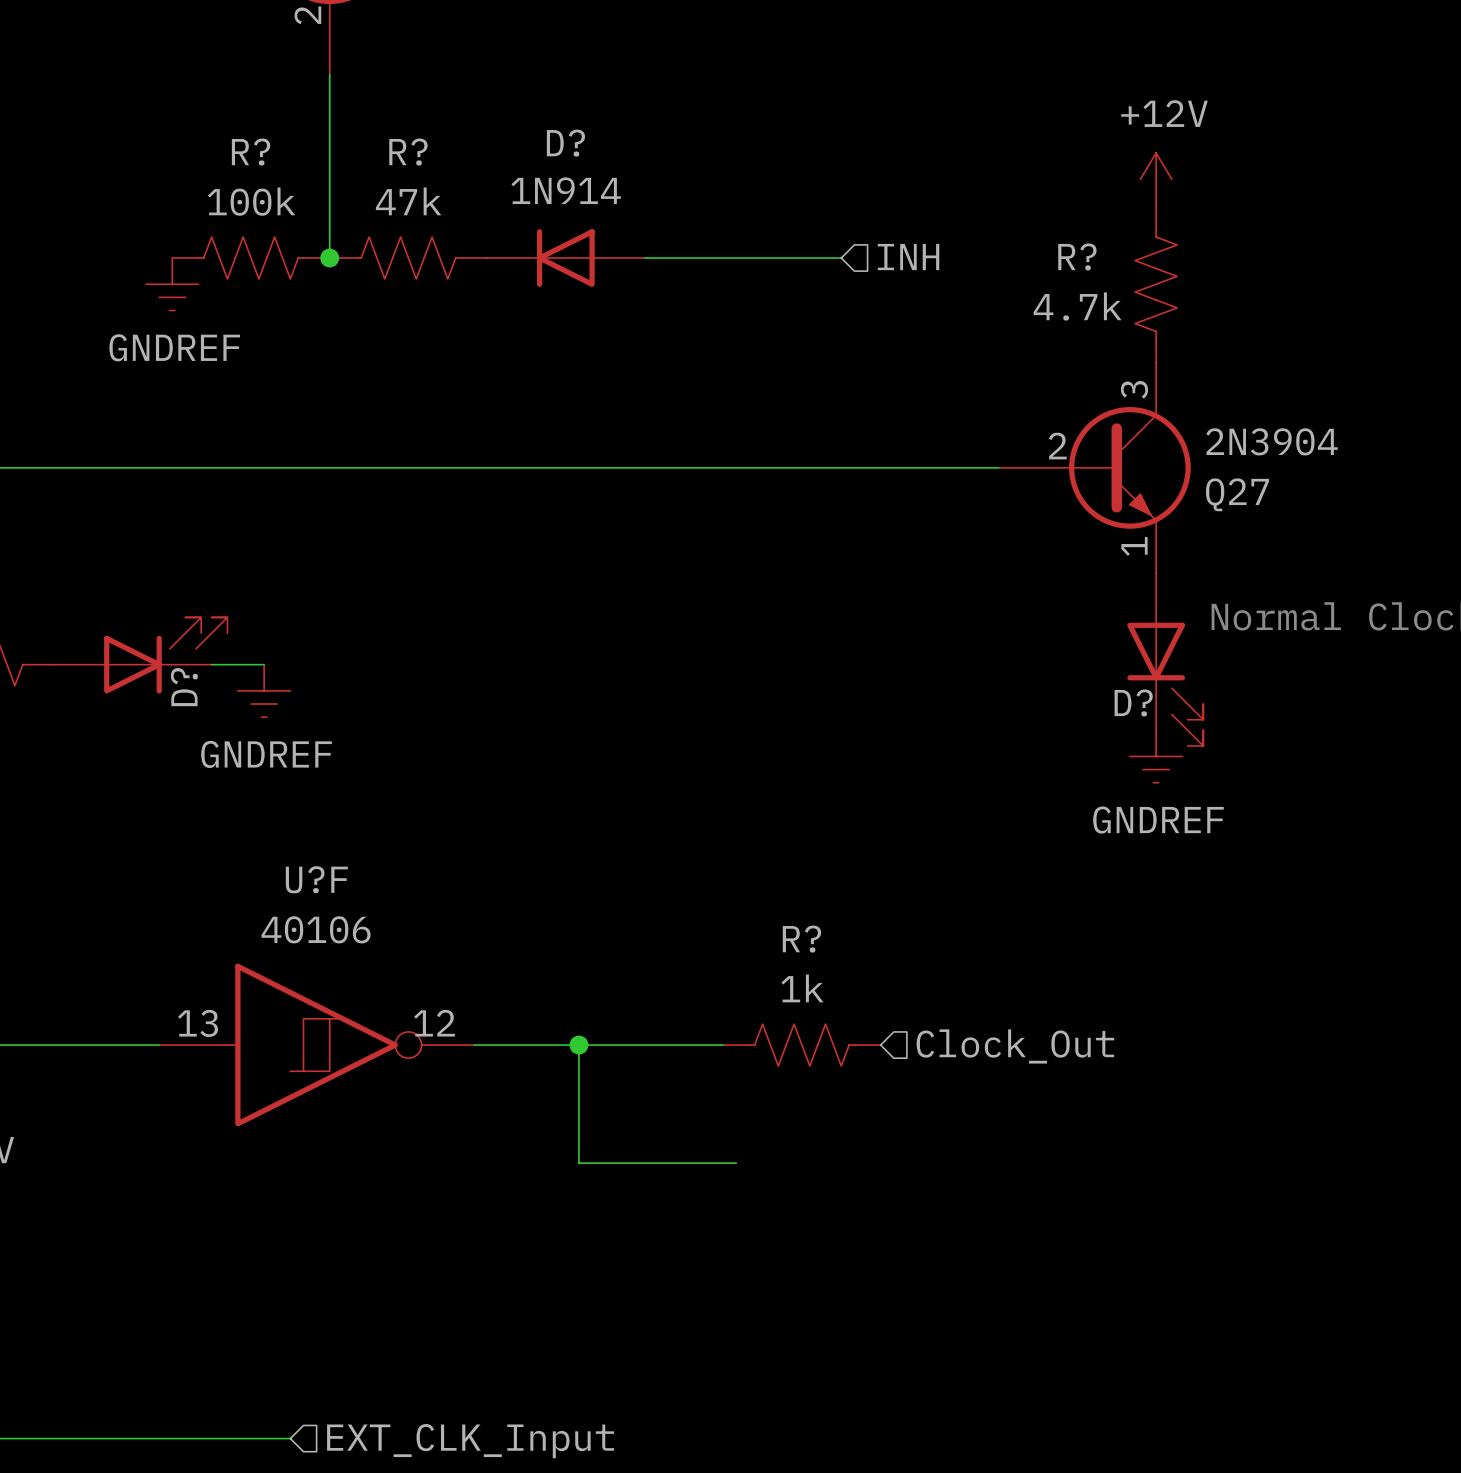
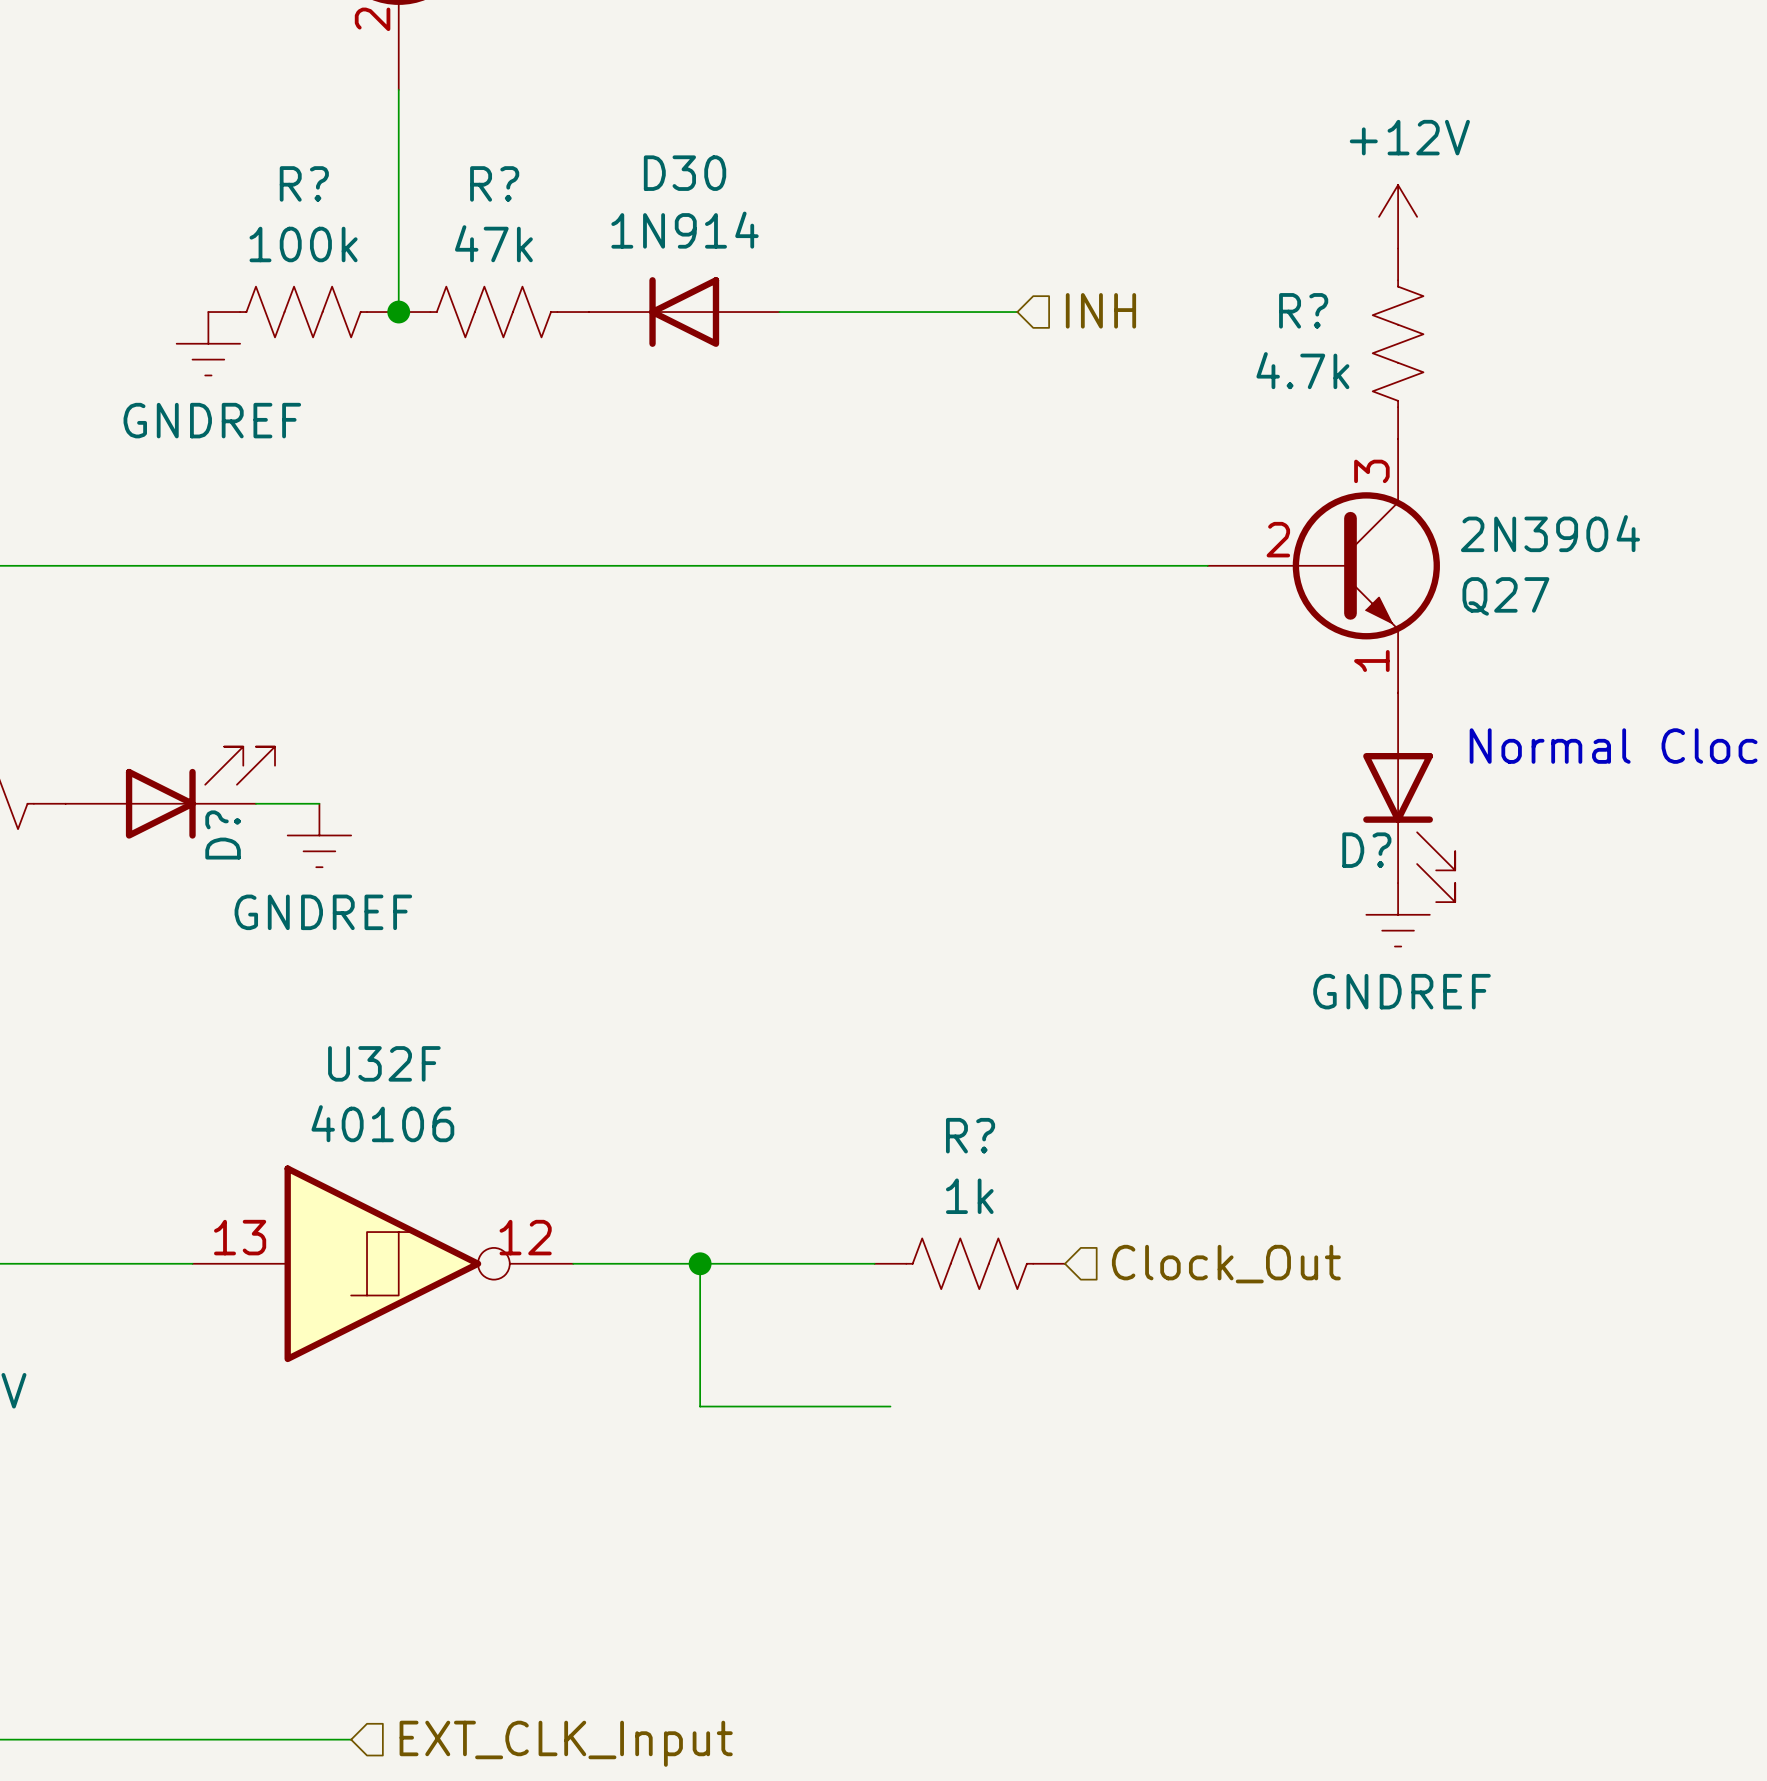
D? name: D? (565, 143) -> D30 (685, 173)
U?F name: U?F (316, 879) -> U32F (384, 1063)

